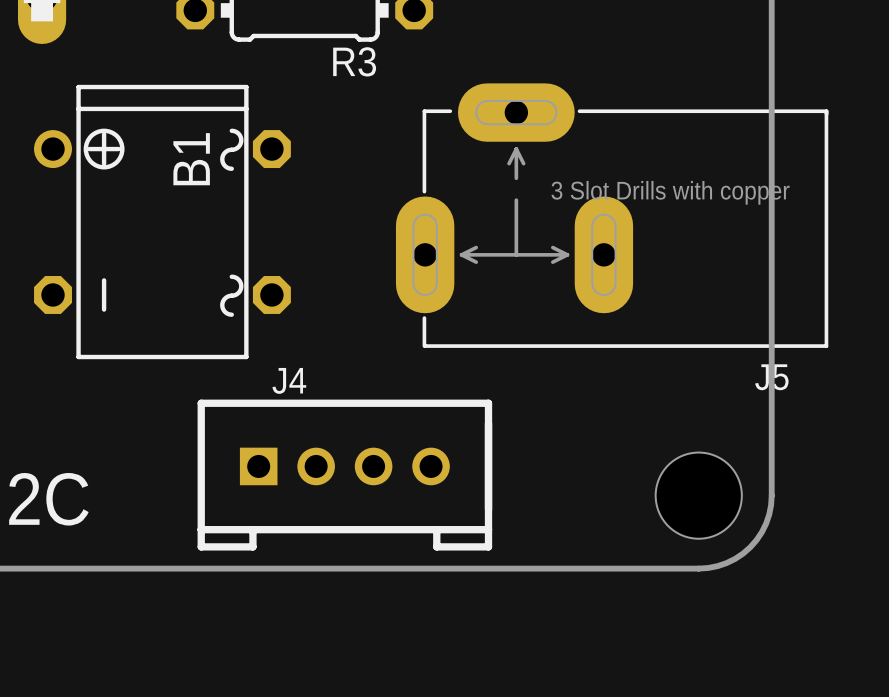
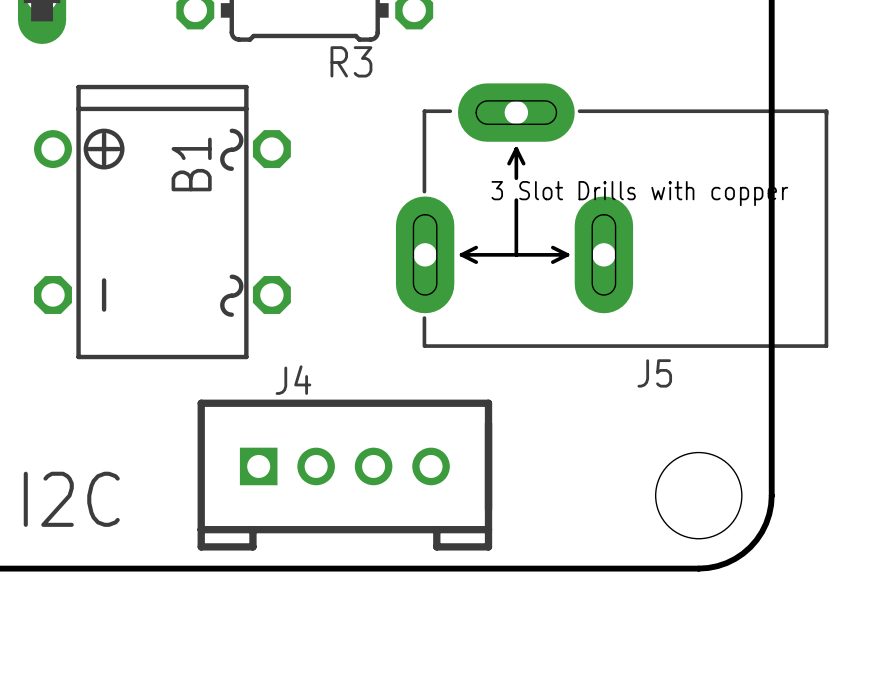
J5 name position: J5 (771, 377) -> J5 (654, 373)

